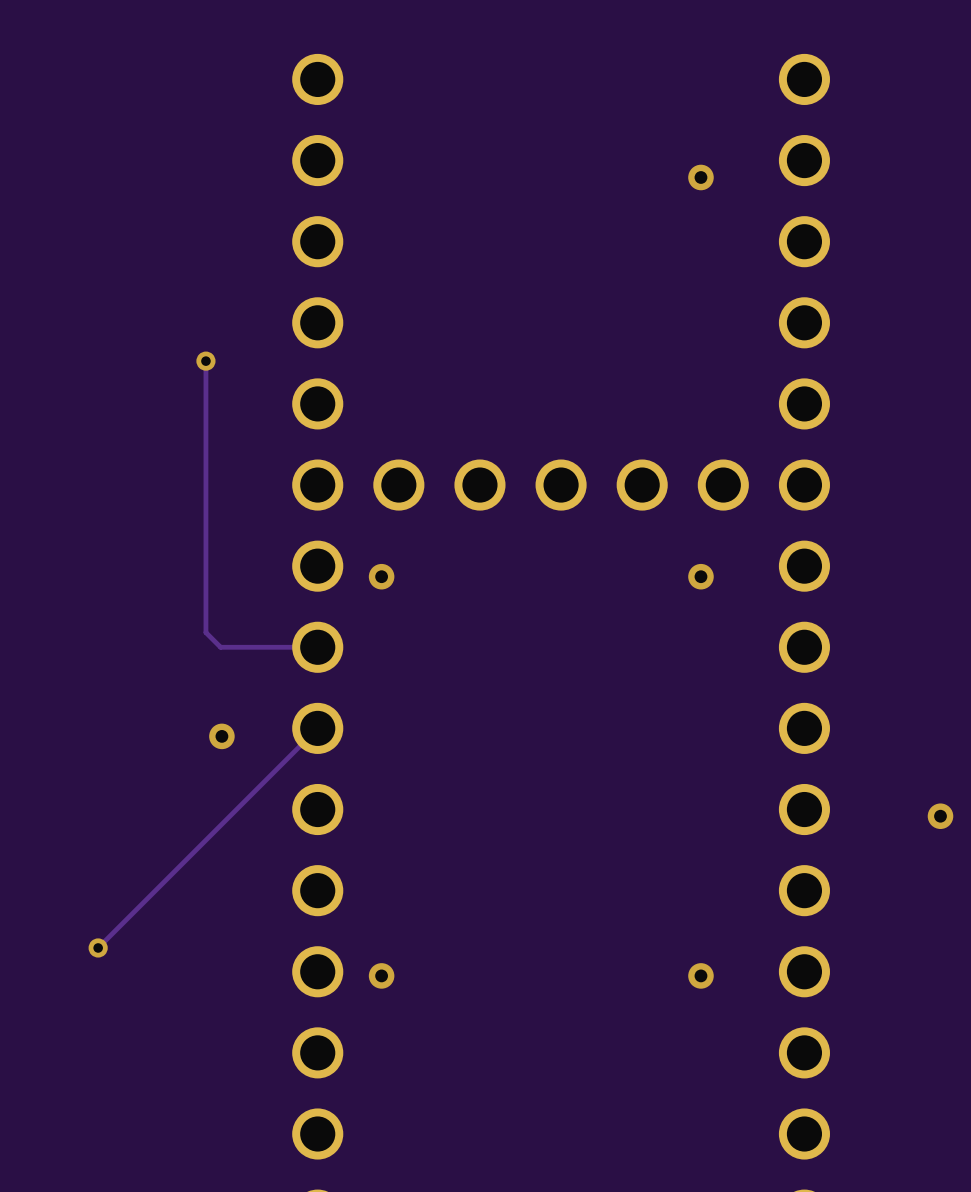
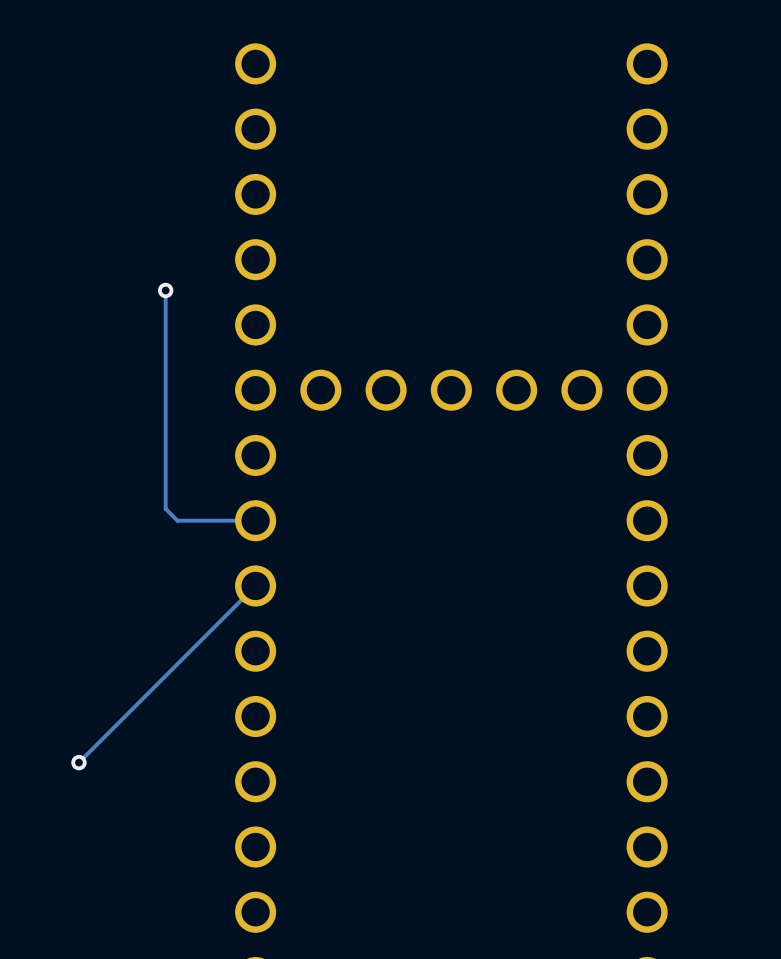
via: (700, 177) -> none
via: (381, 576) -> none
via: (700, 576) -> none
via: (221, 736) -> none
via: (940, 816) -> none
via: (381, 975) -> none
via: (700, 975) -> none

